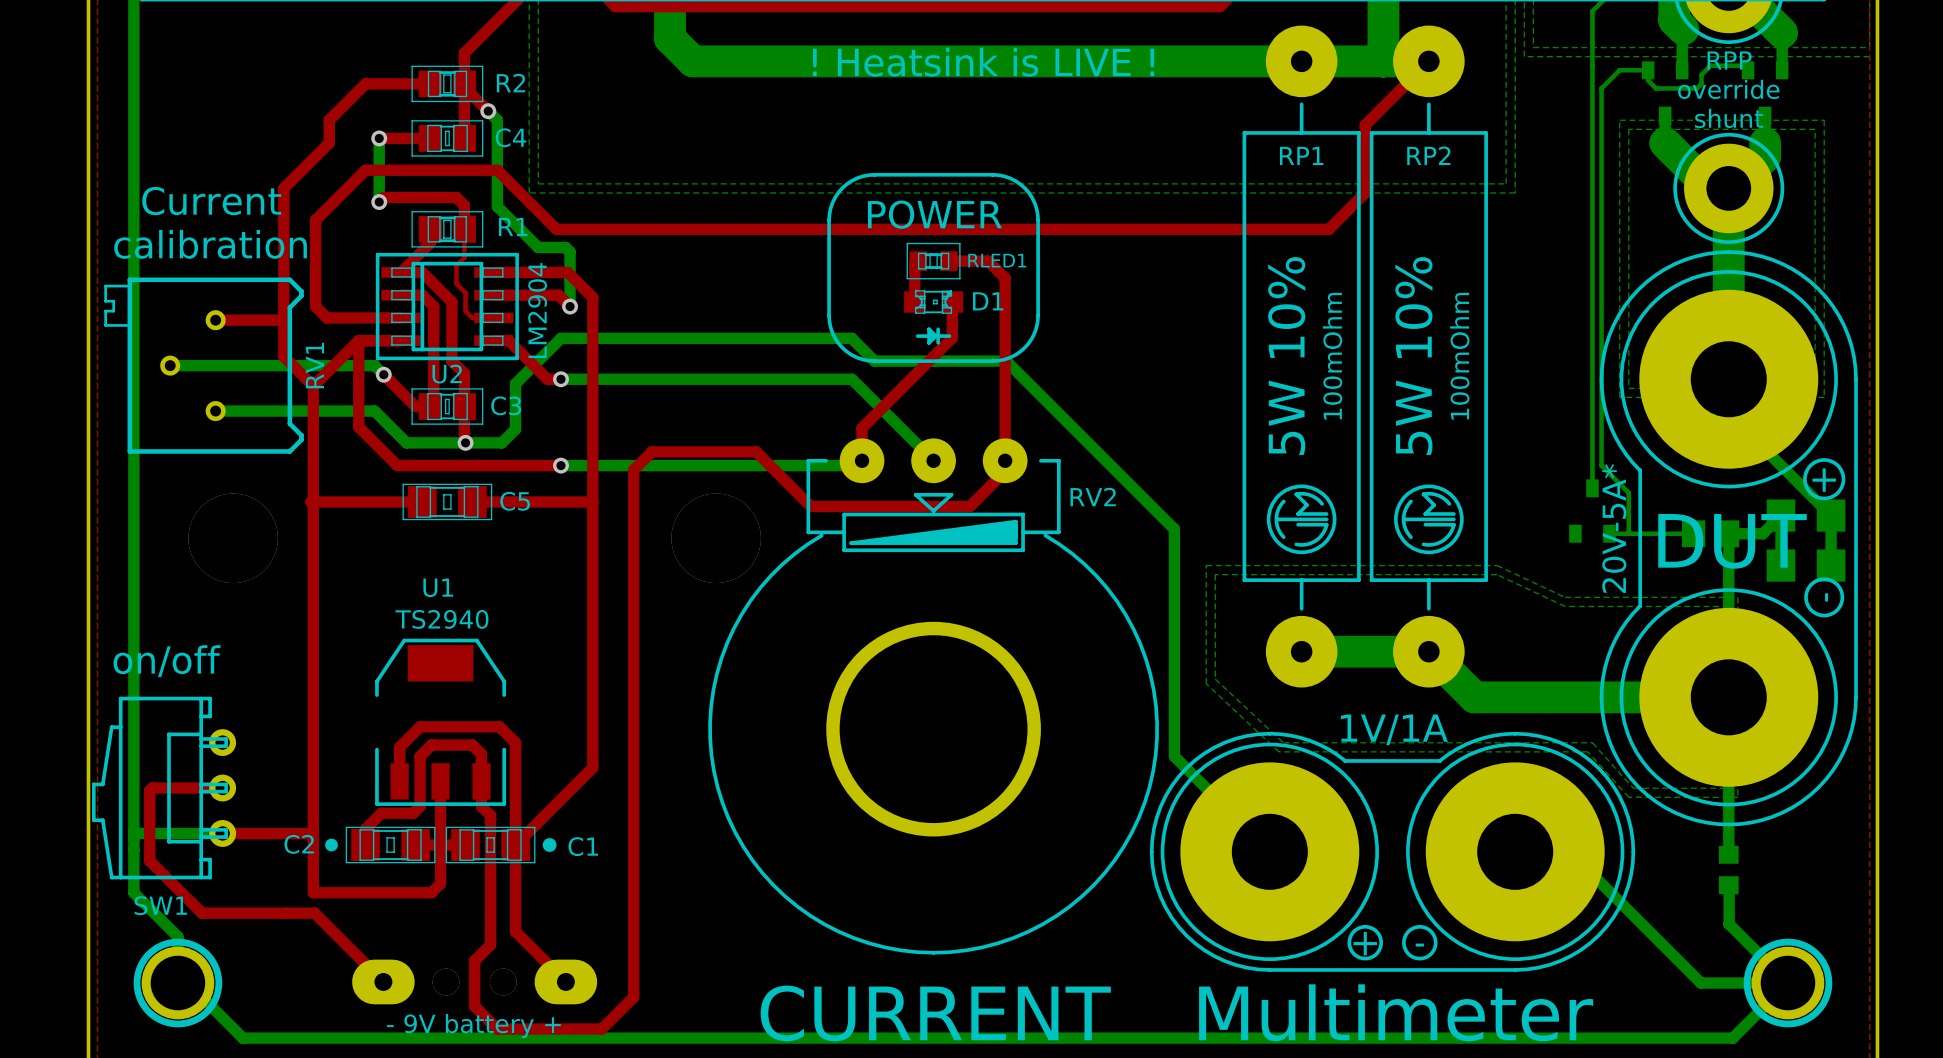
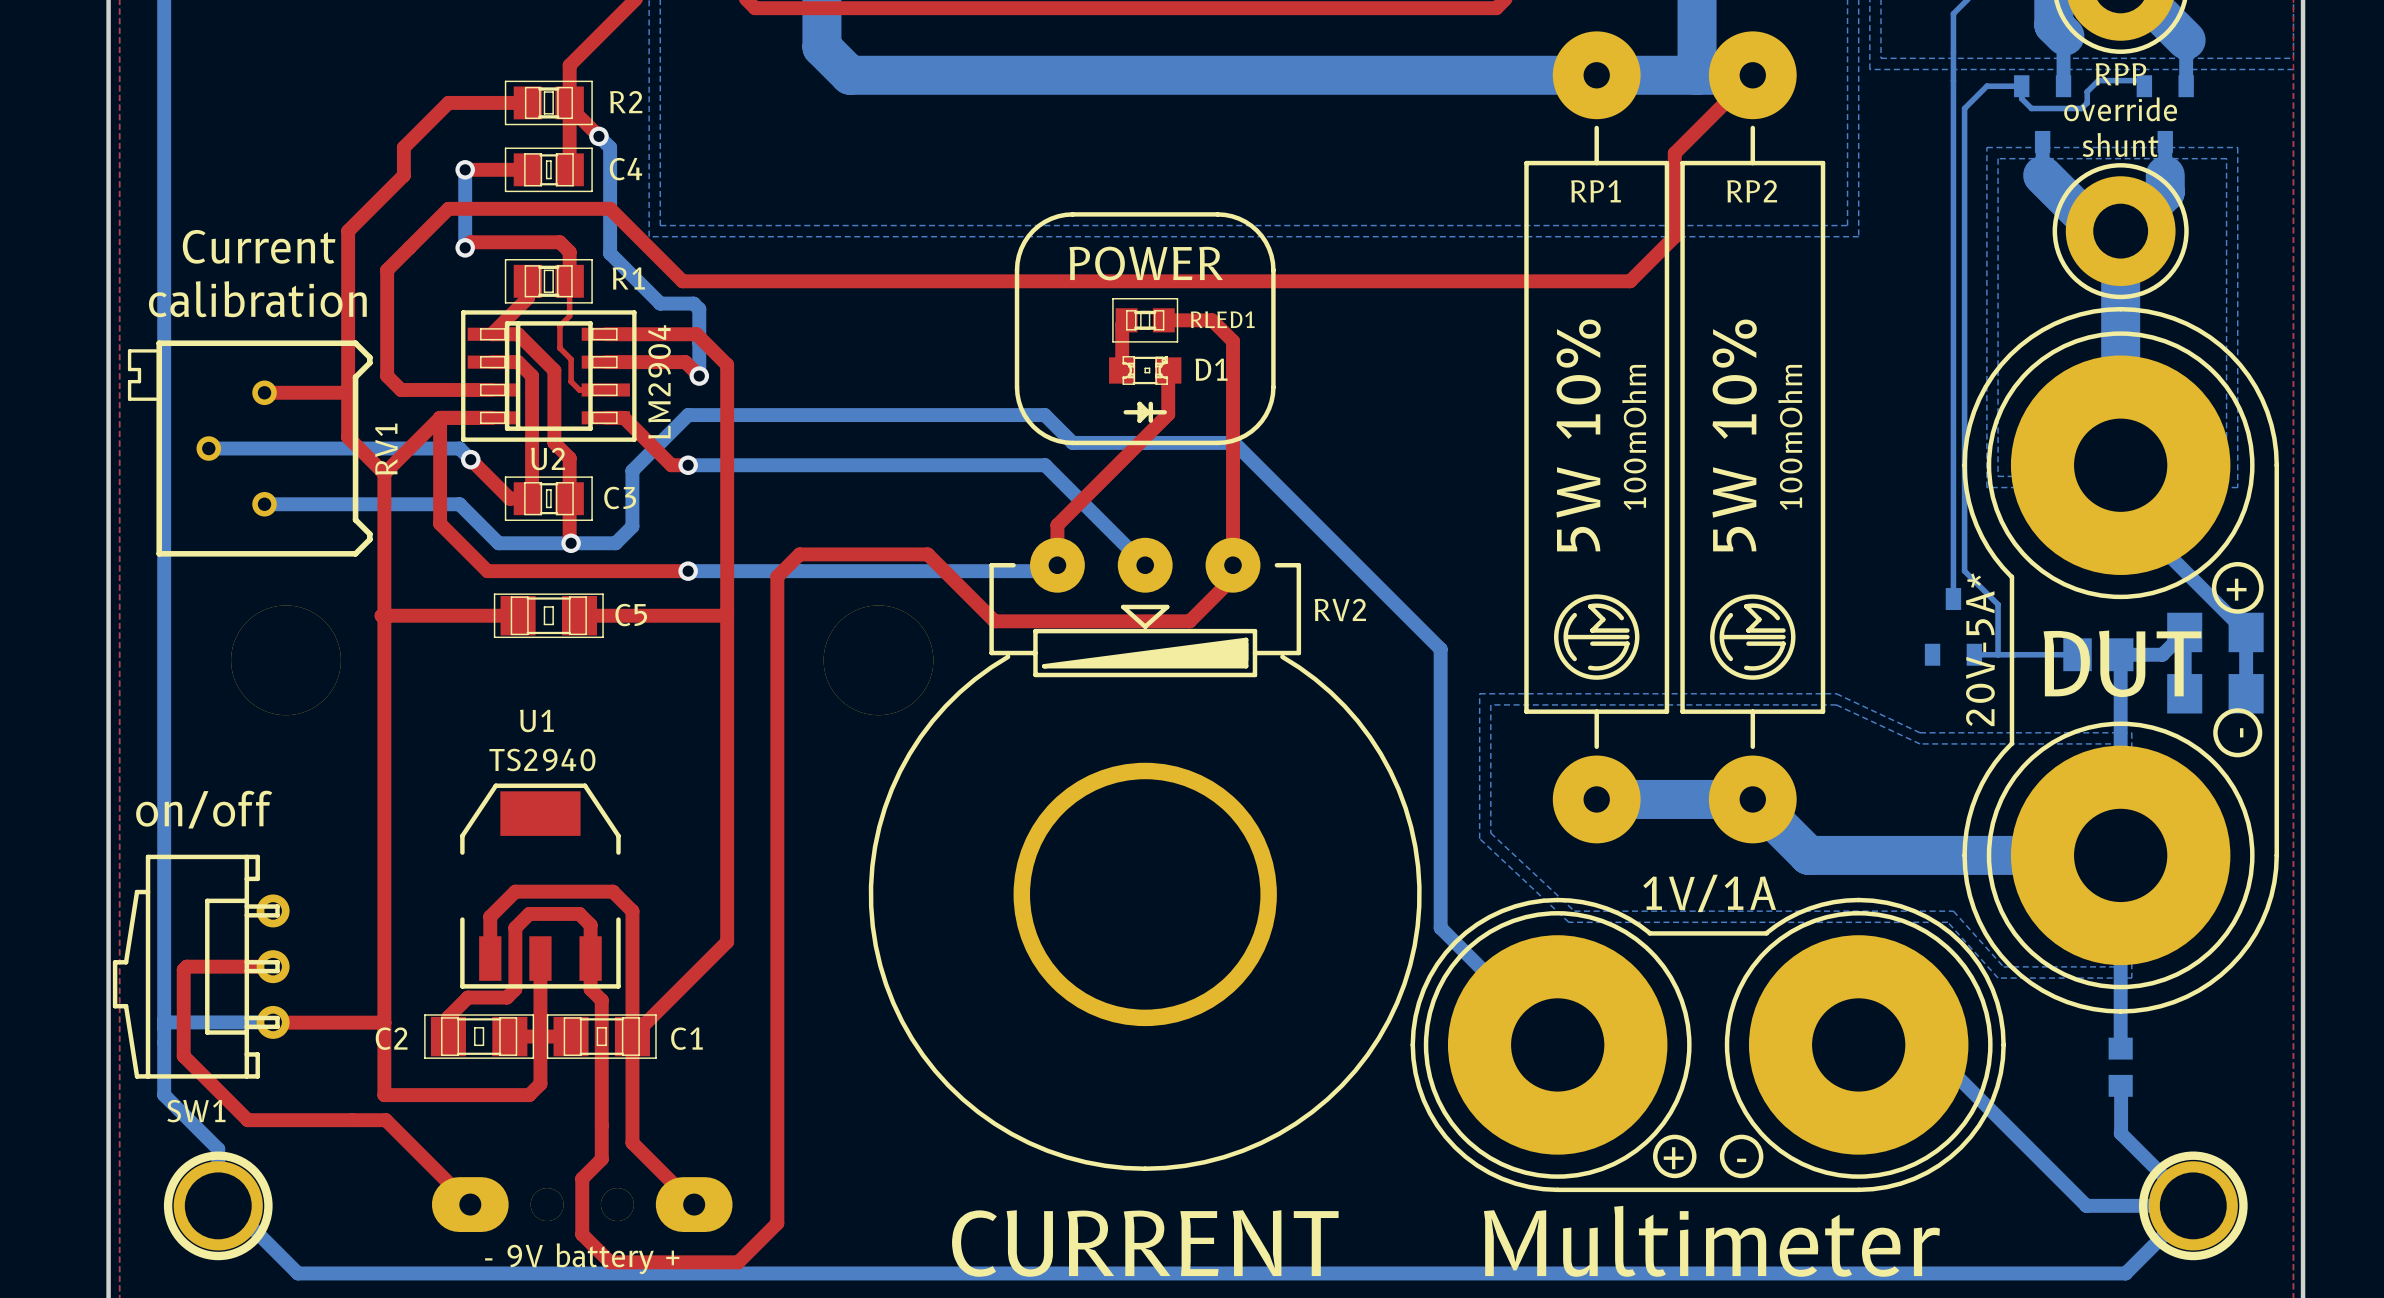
text: ! Heatsink is LIVE ! (983, 62) -> none
drawing: [325, 838, 338, 852] -> none
drawing: [542, 838, 557, 852] -> none
C2 name position: C2 (299, 844) -> C2 (391, 1038)
C1 name position: C1 (583, 846) -> C1 (686, 1038)

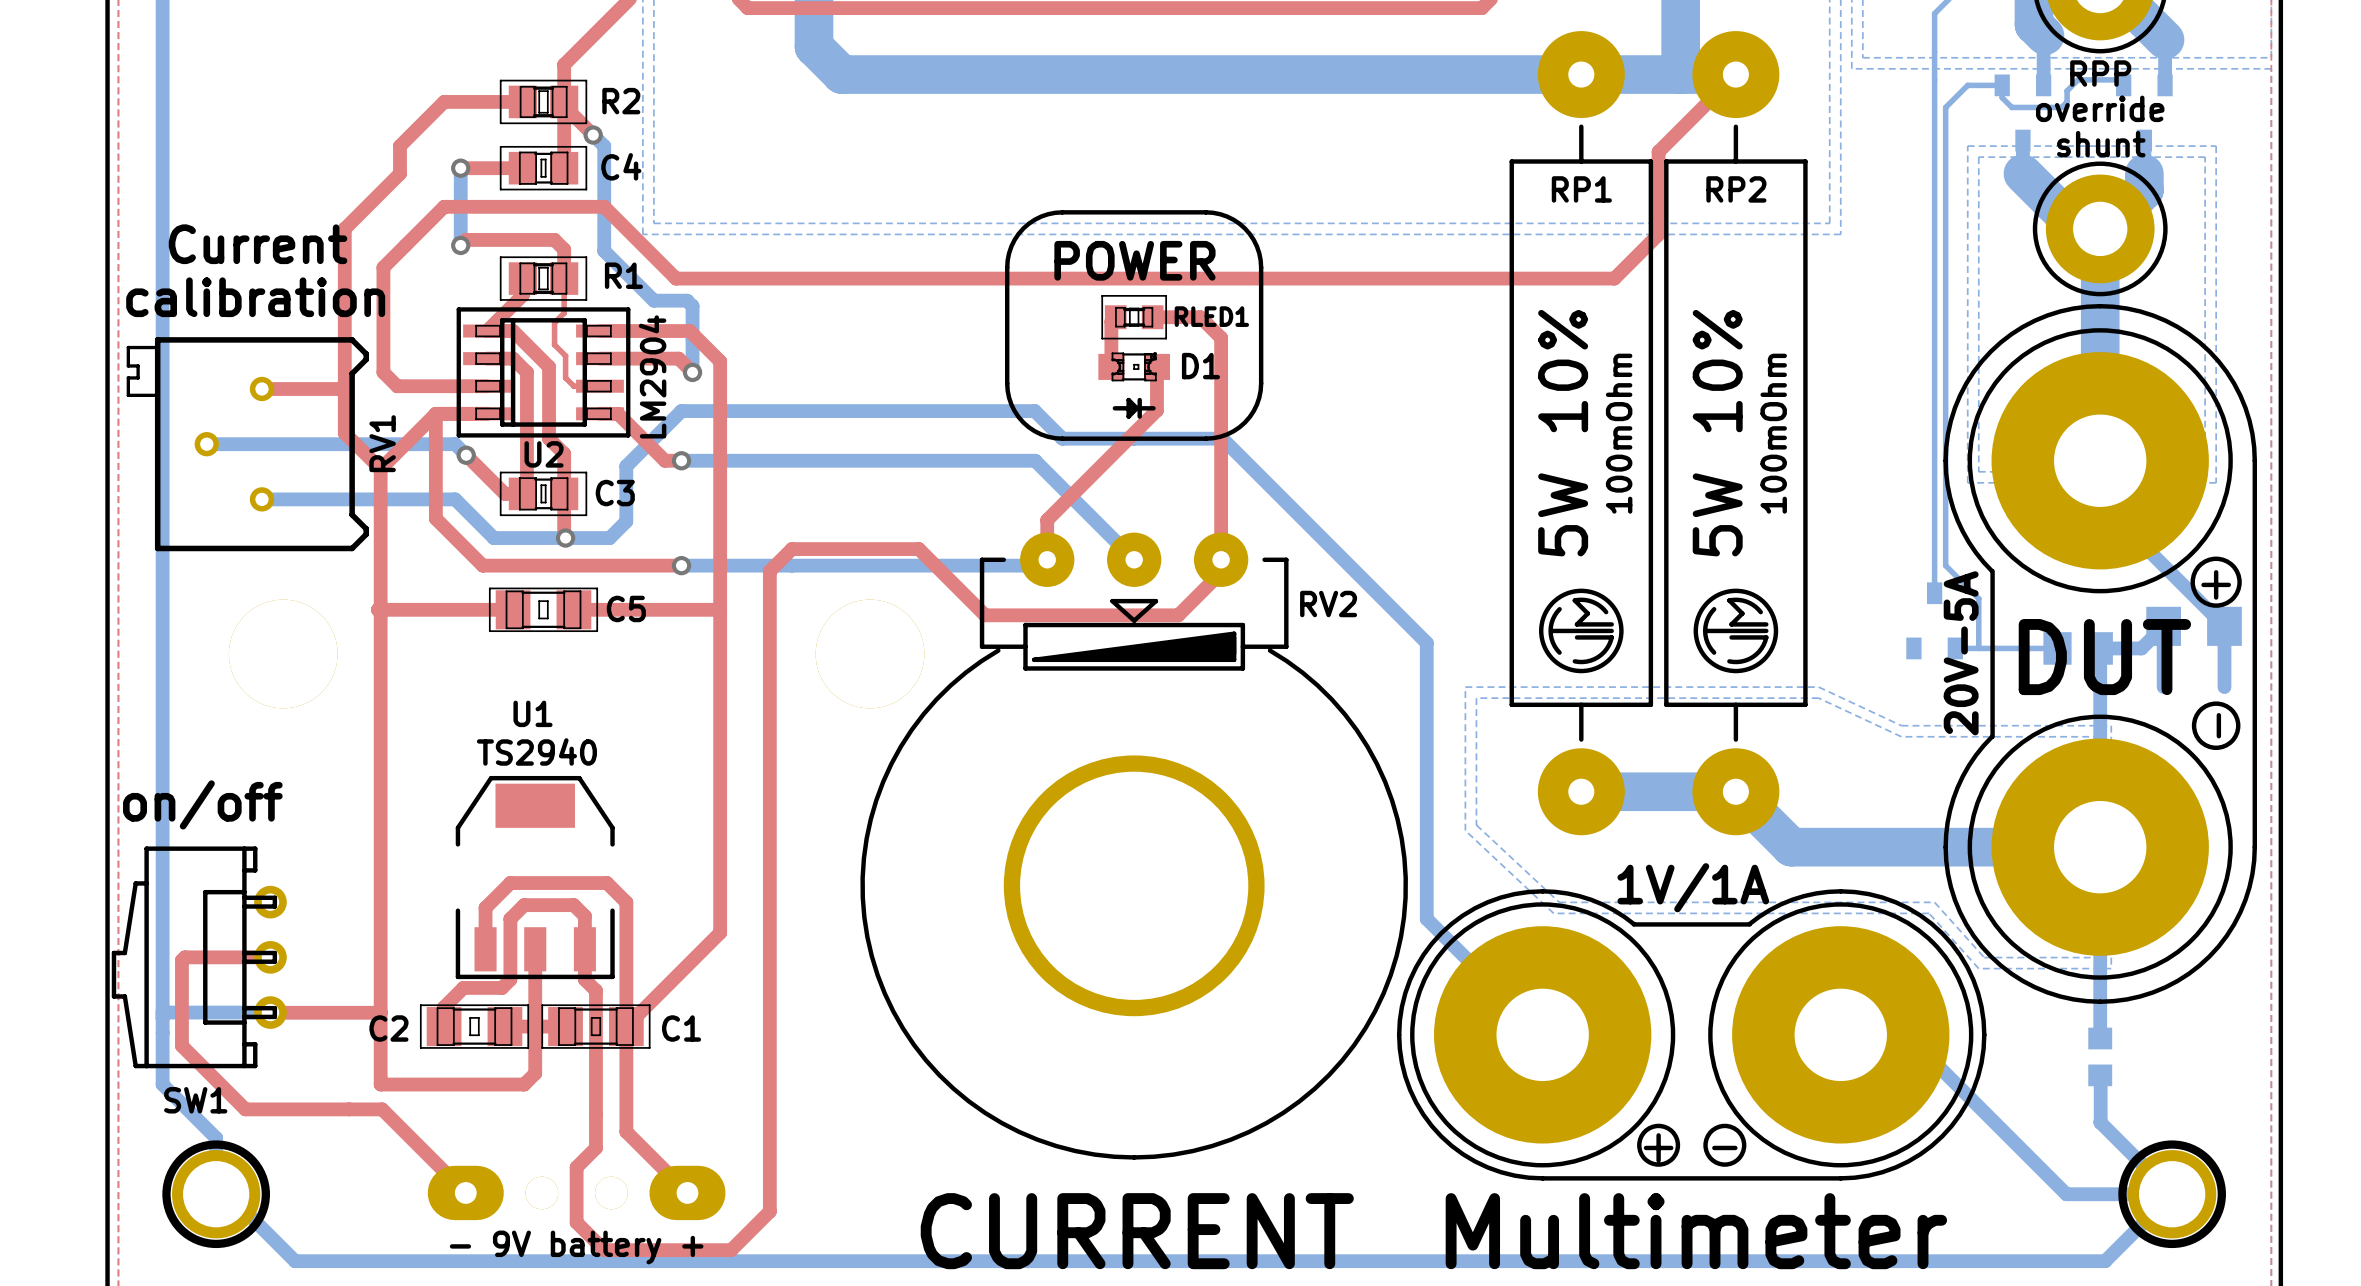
text: 20V-5A* (1980, 649) -> 20V-5A (1961, 653)
part: (2215, 693) -> none

